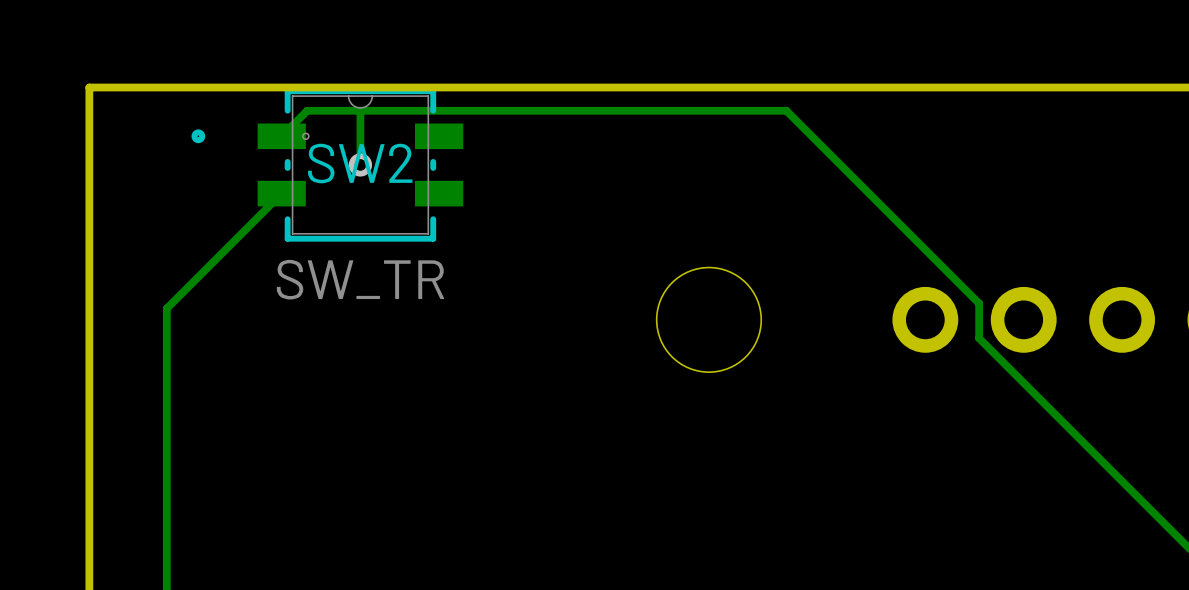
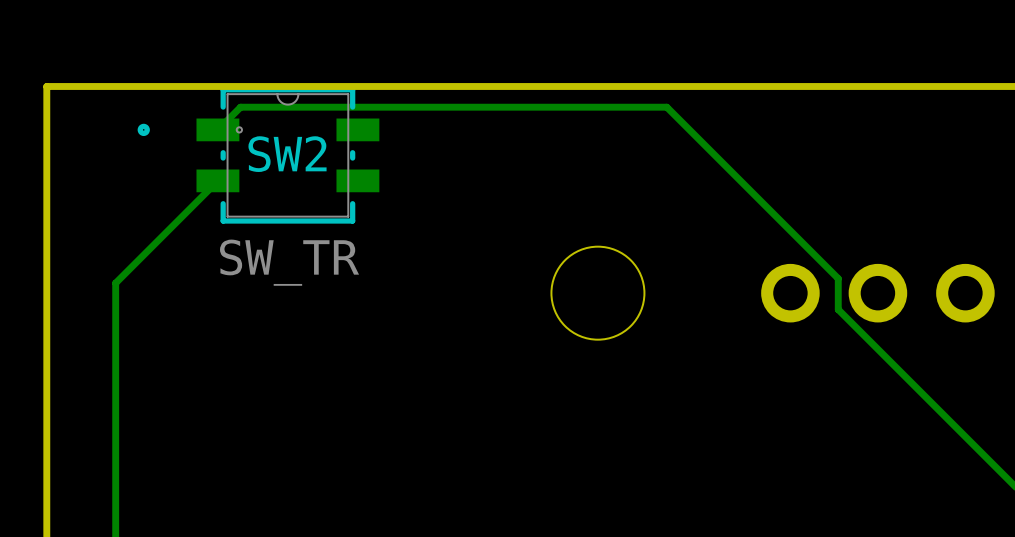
track: (360, 110) (360, 164) -> none
via: (360, 164) -> none

